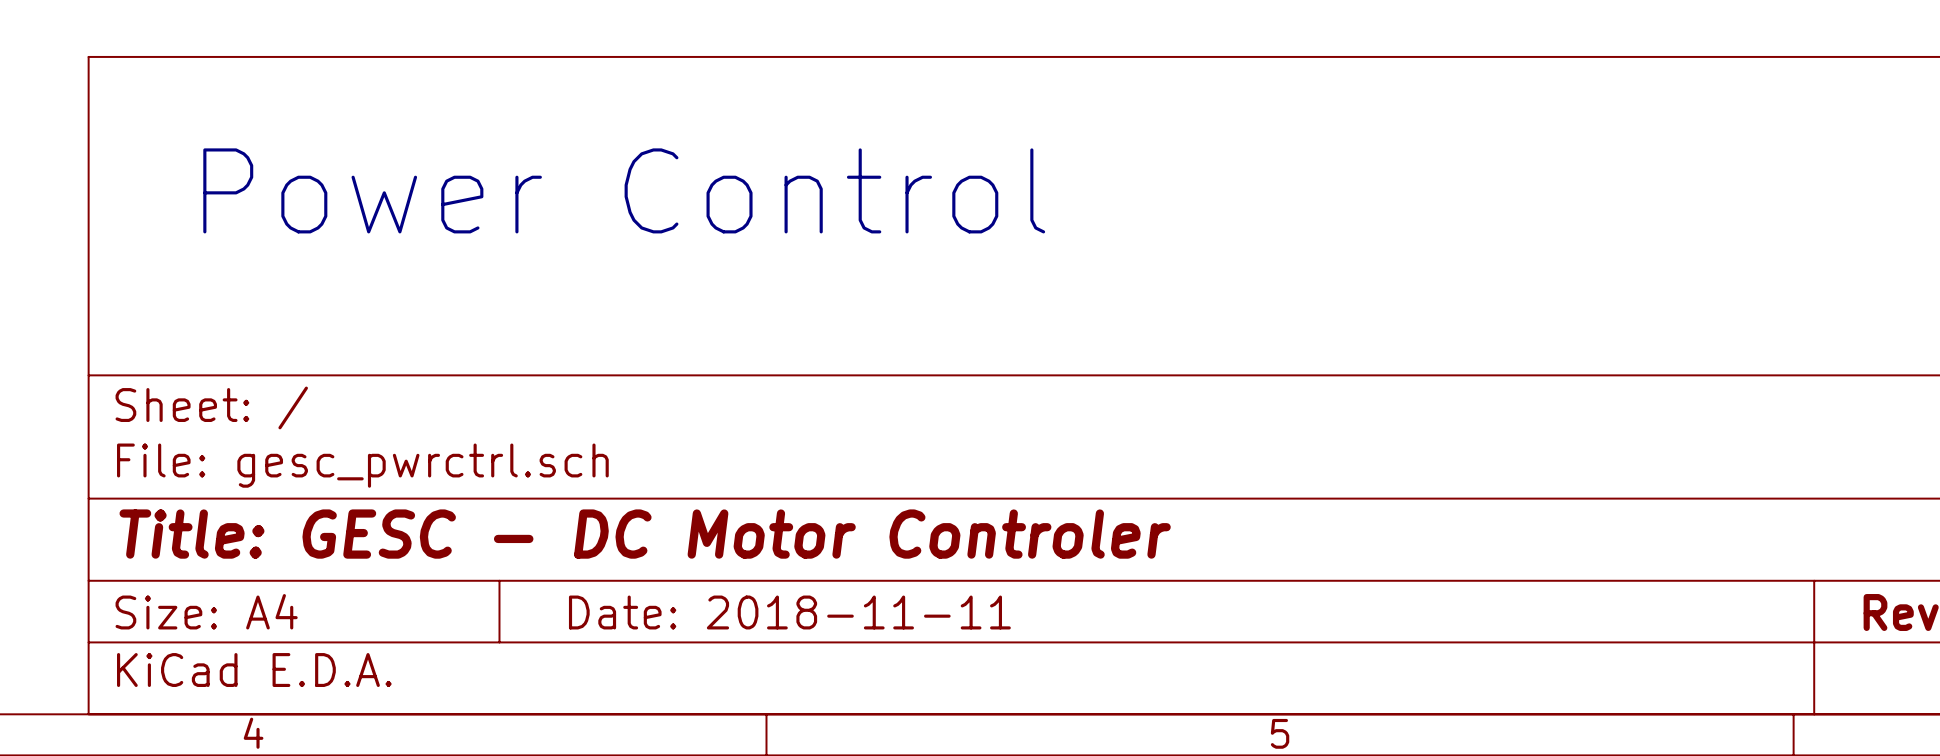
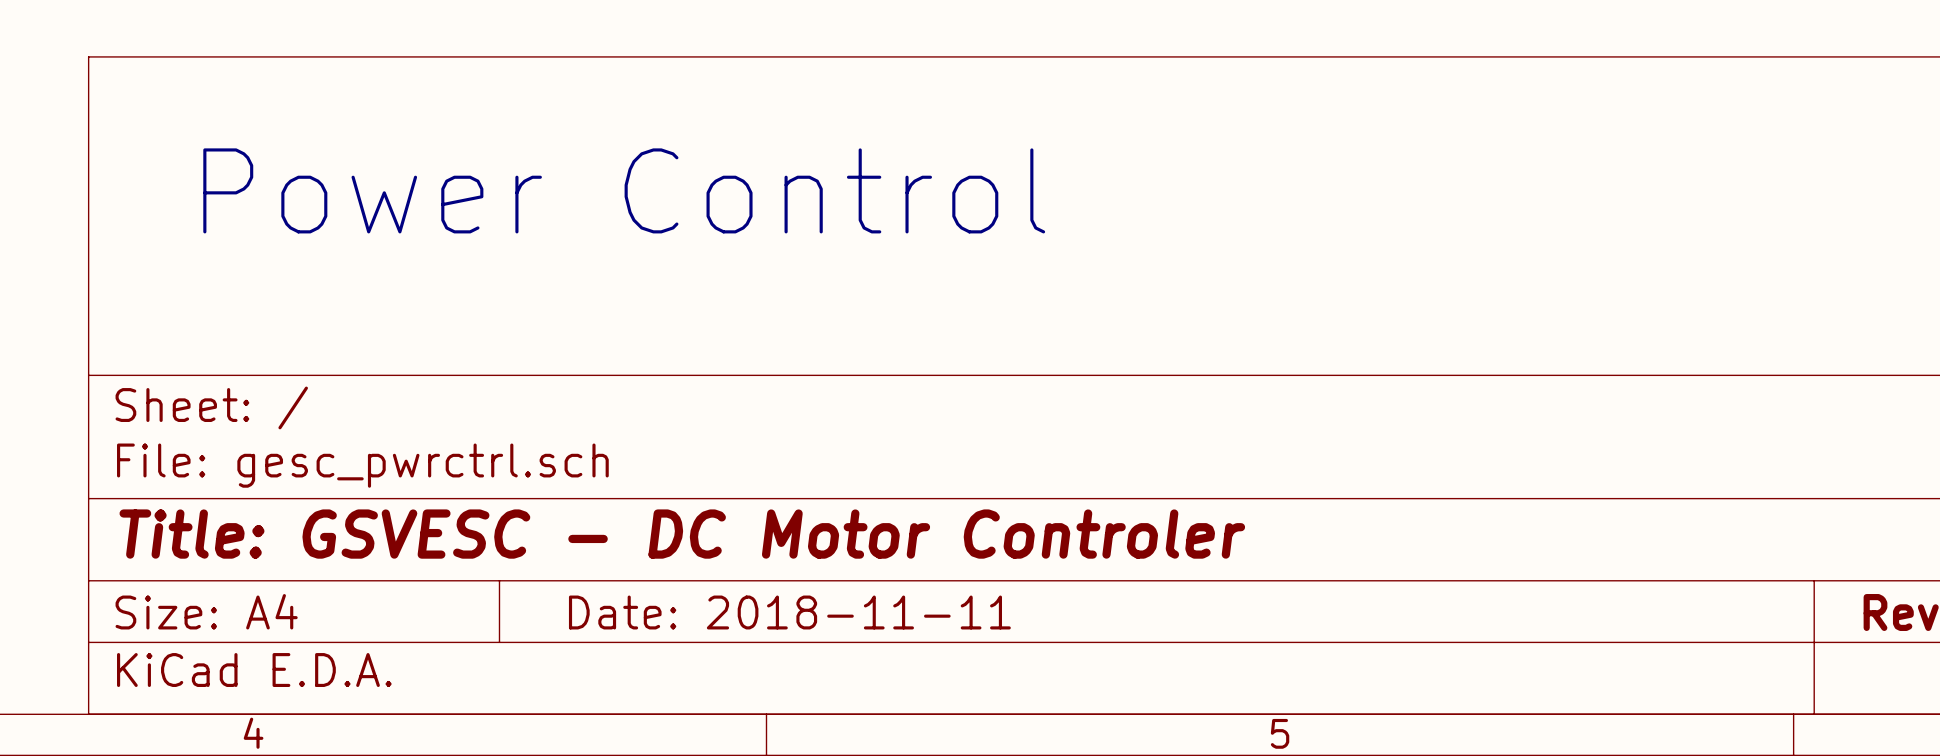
title block: Title: GESC - DC Motor Controler (645, 534) -> Title: GSVESC - DC Motor Controler (682, 534)

